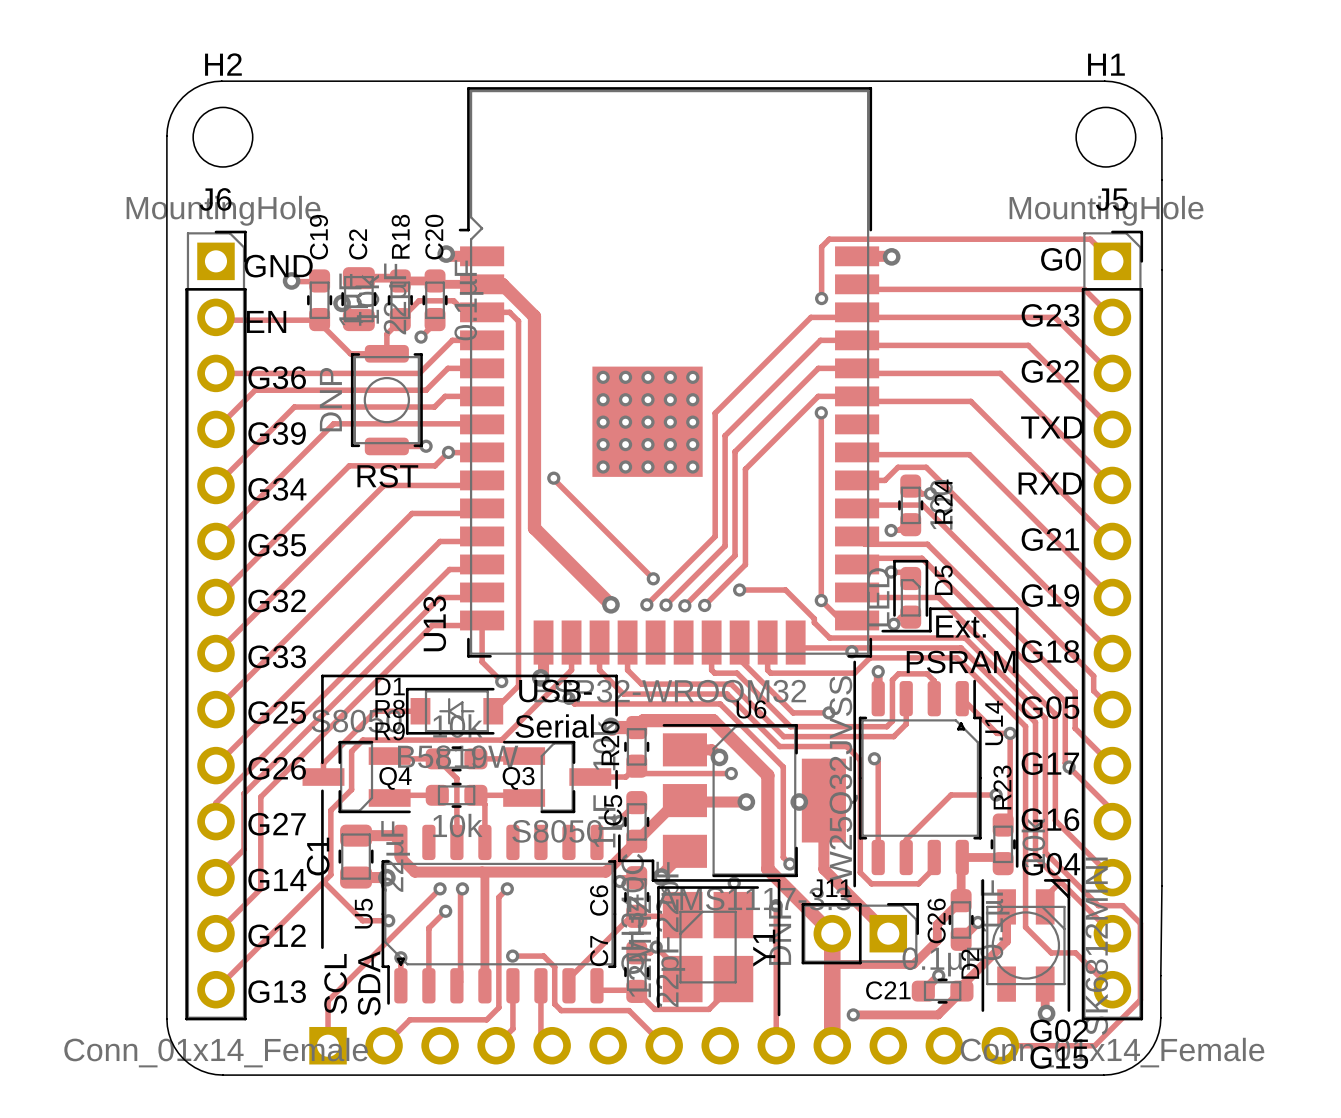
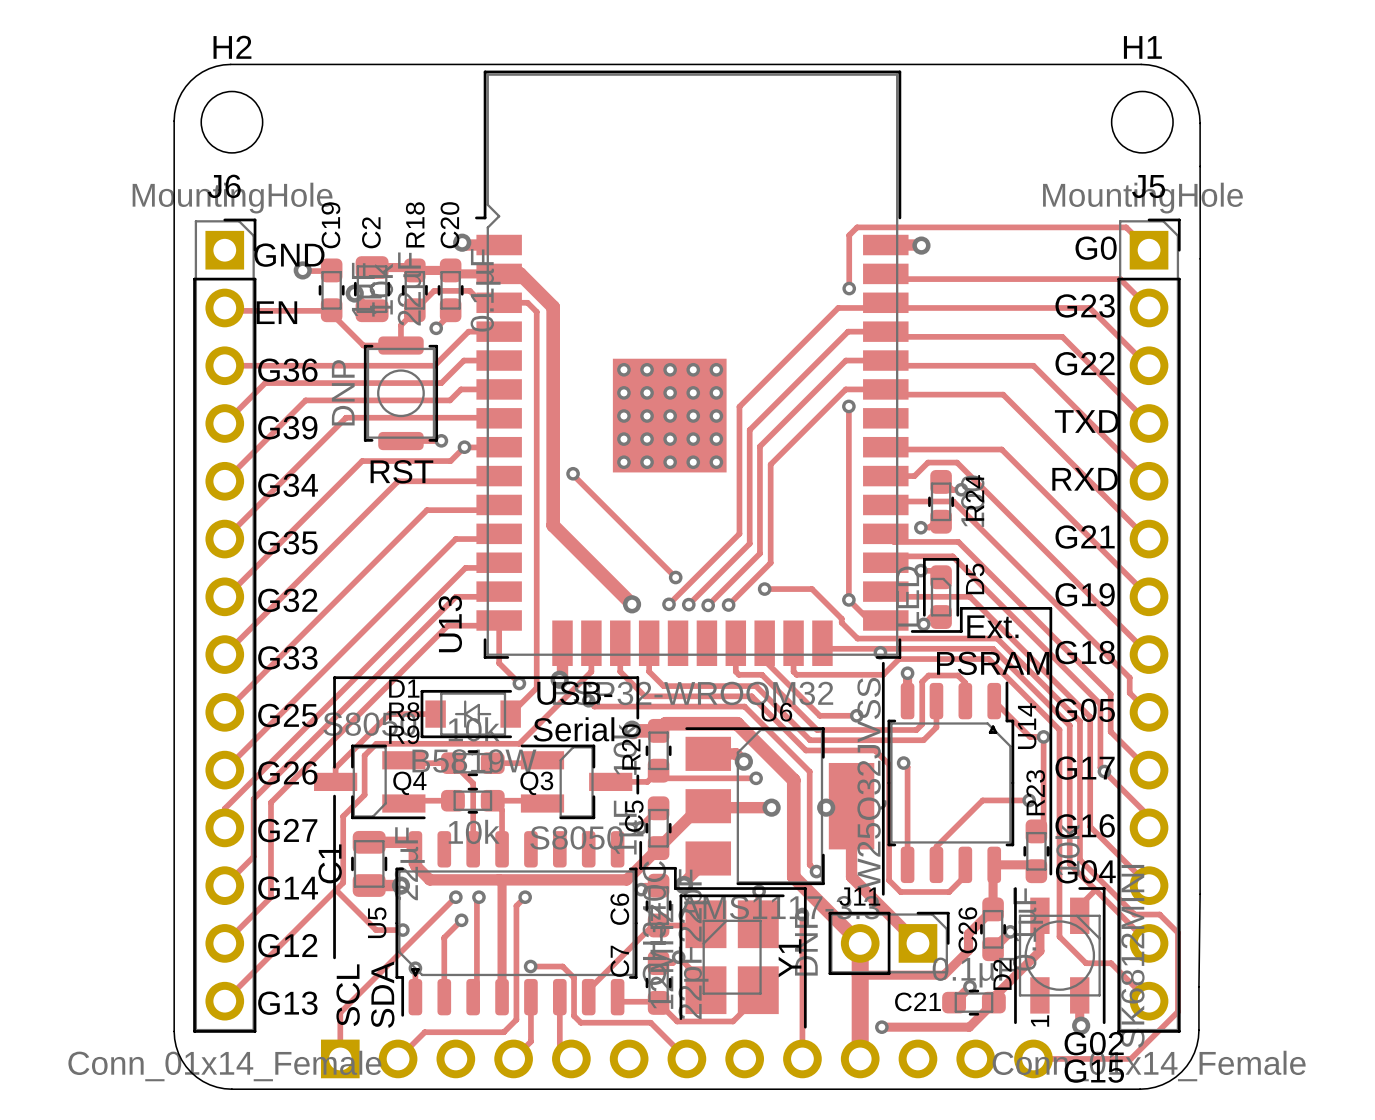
D2 footprint: [981, 879, 1071, 1012] -> [1014, 887, 1106, 1025]

